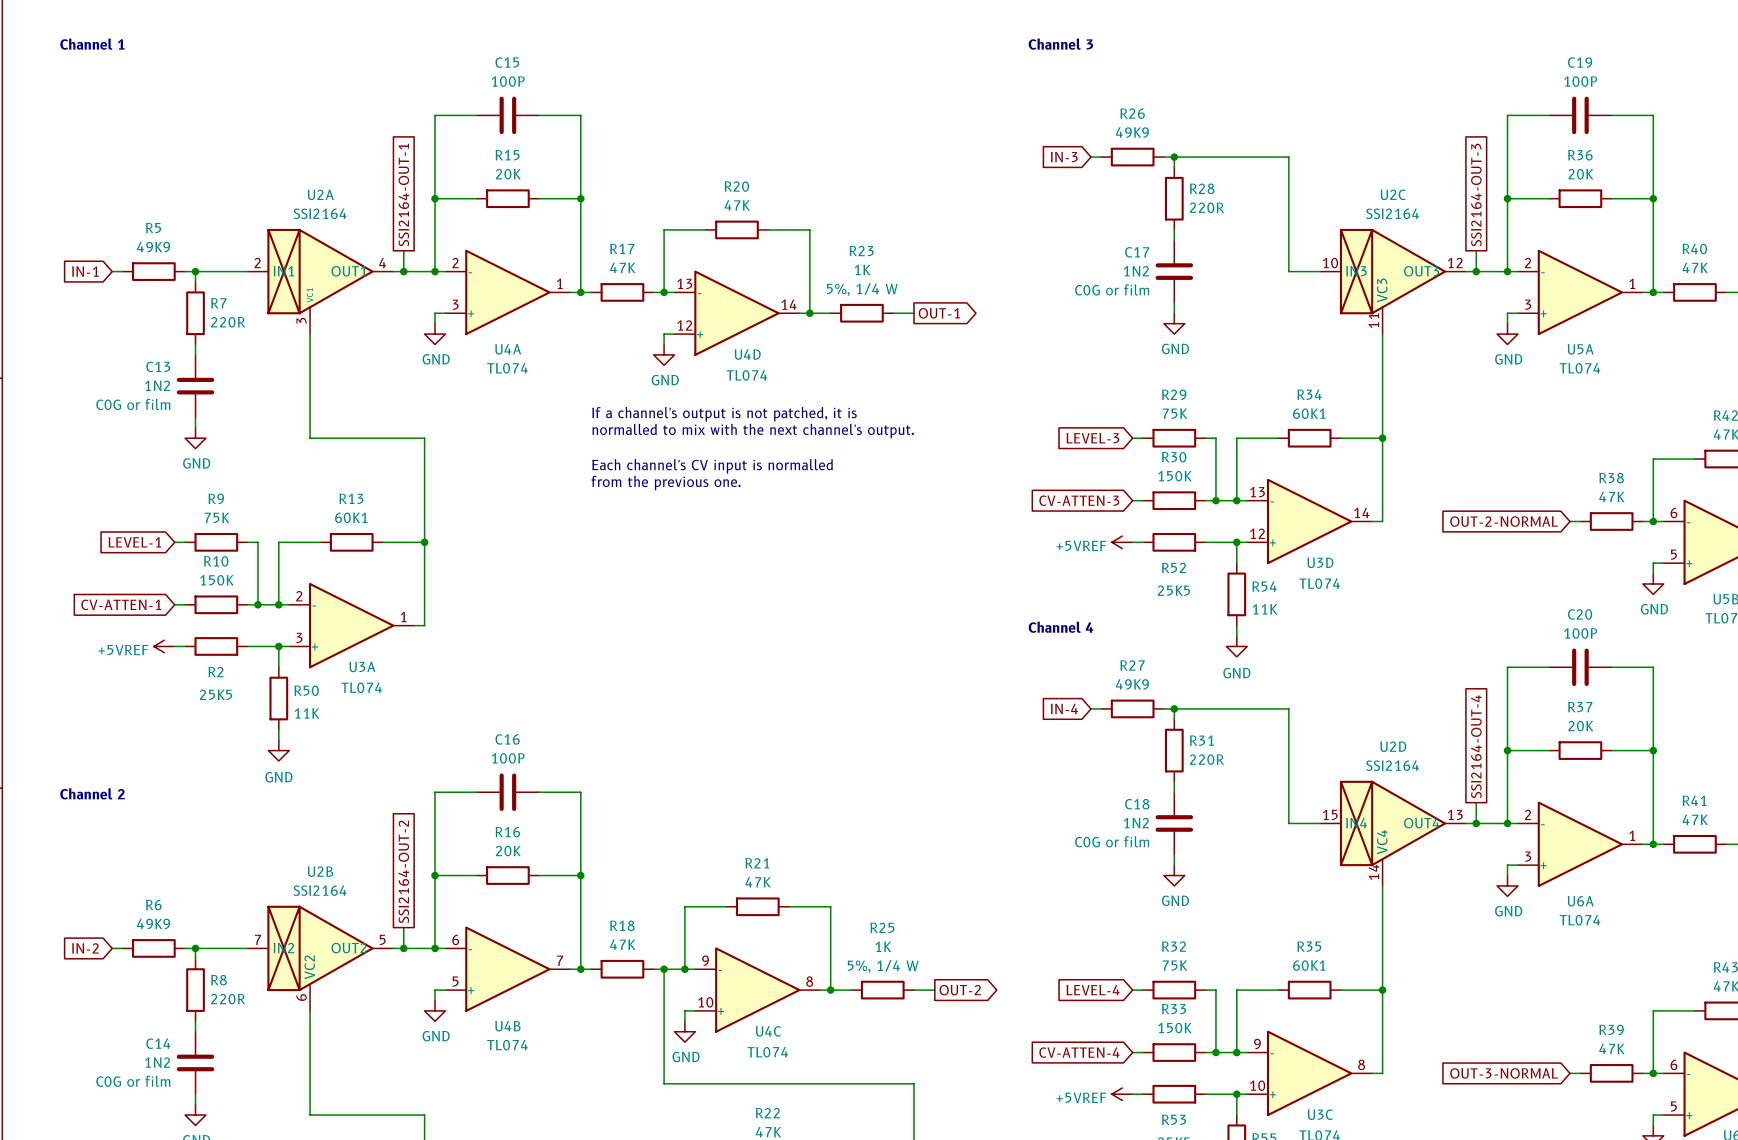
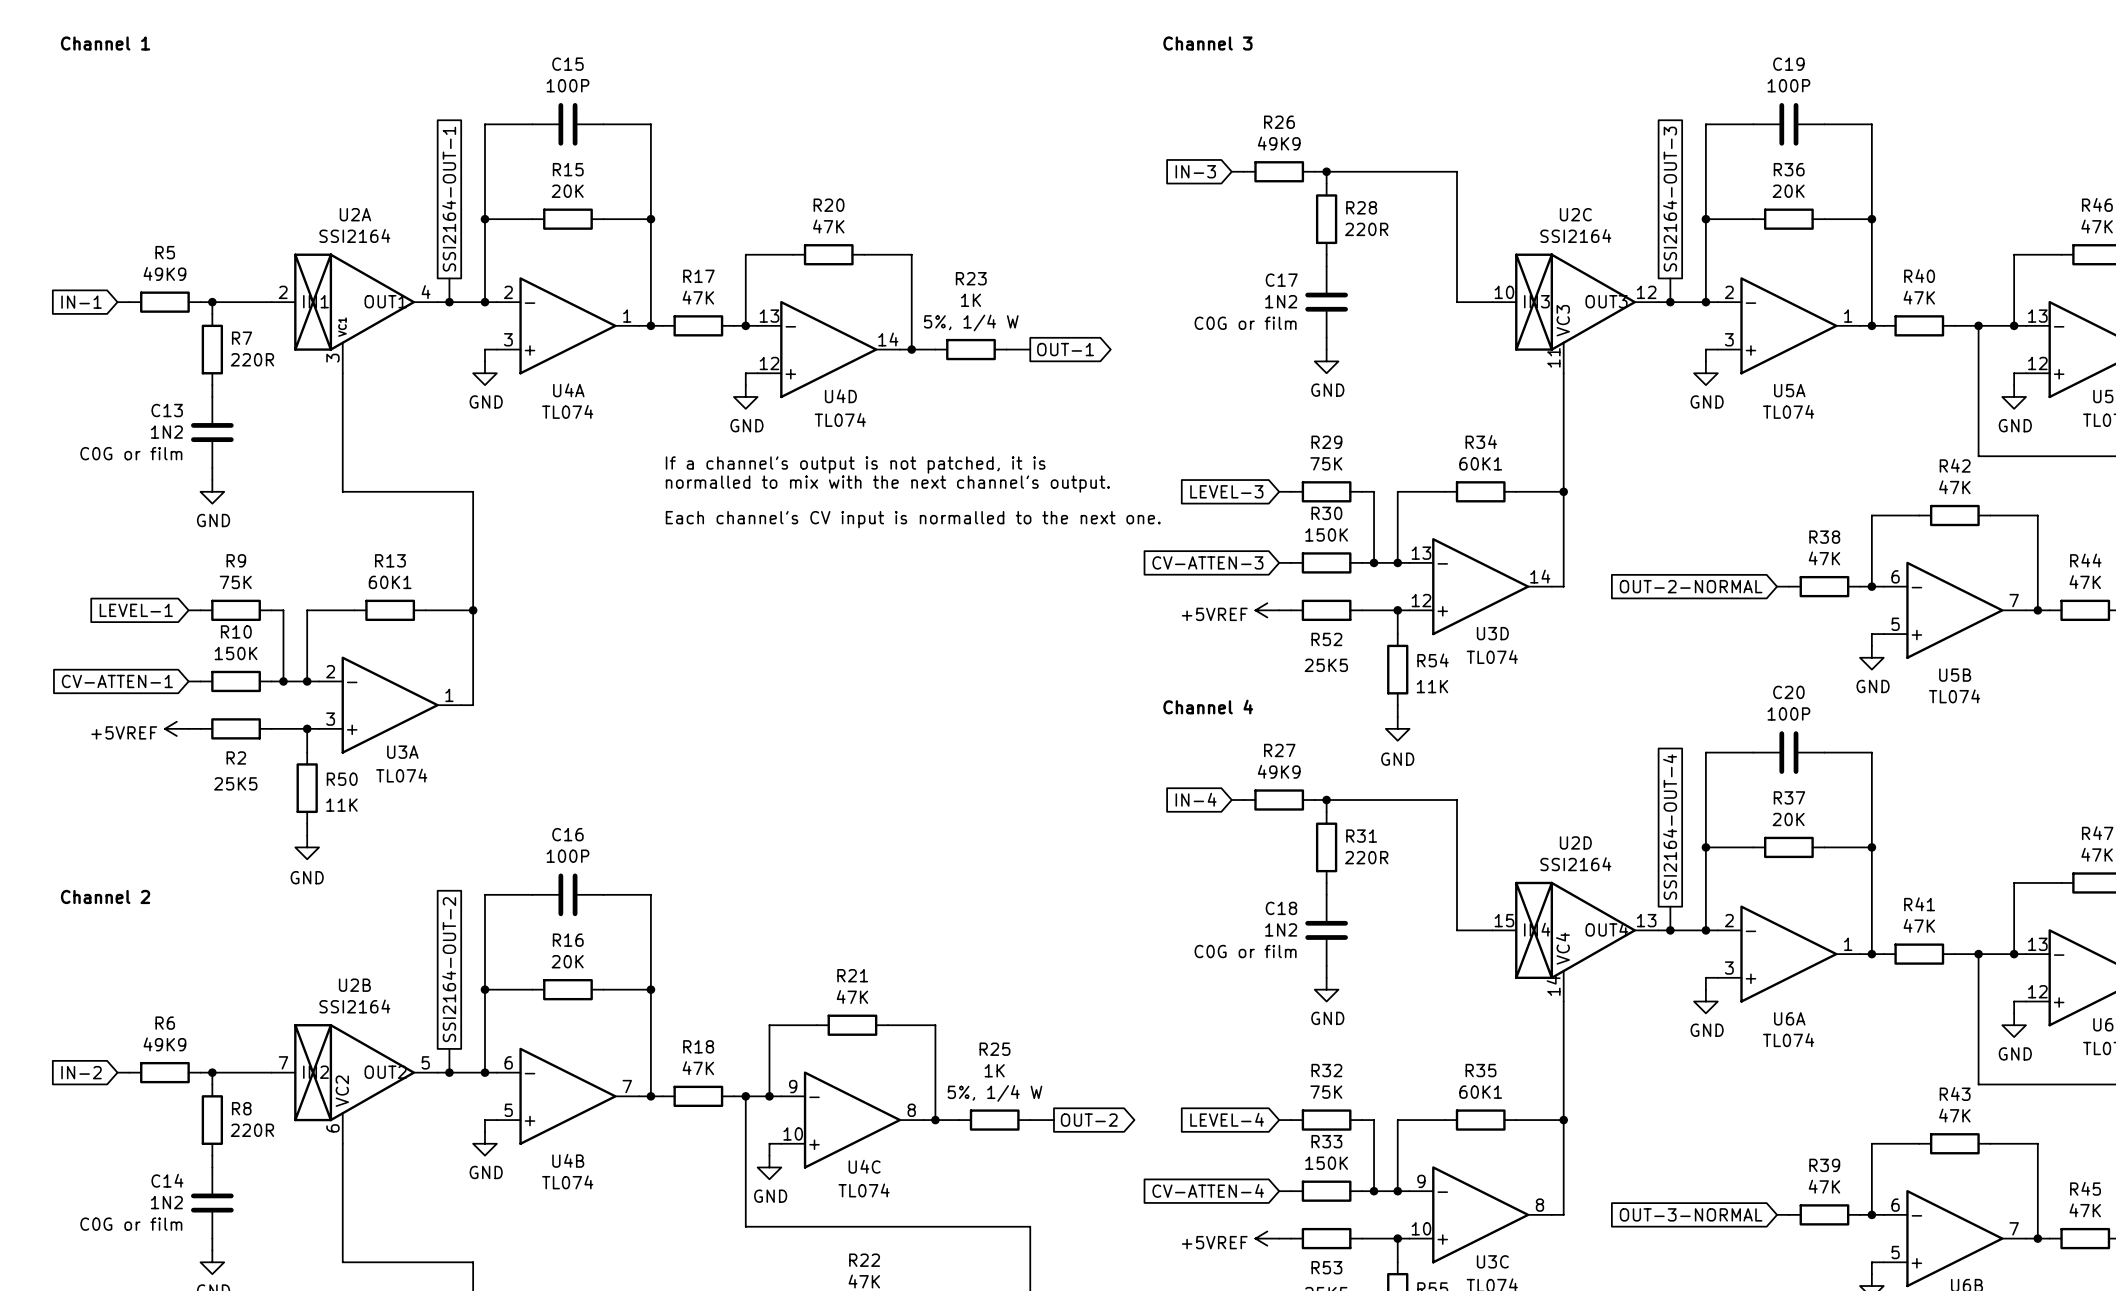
text: Each channel's CV input is normalled (712, 466) -> Each channel's CV input is normalled to the next one. (913, 519)
text: from the previous one. (666, 483) -> none

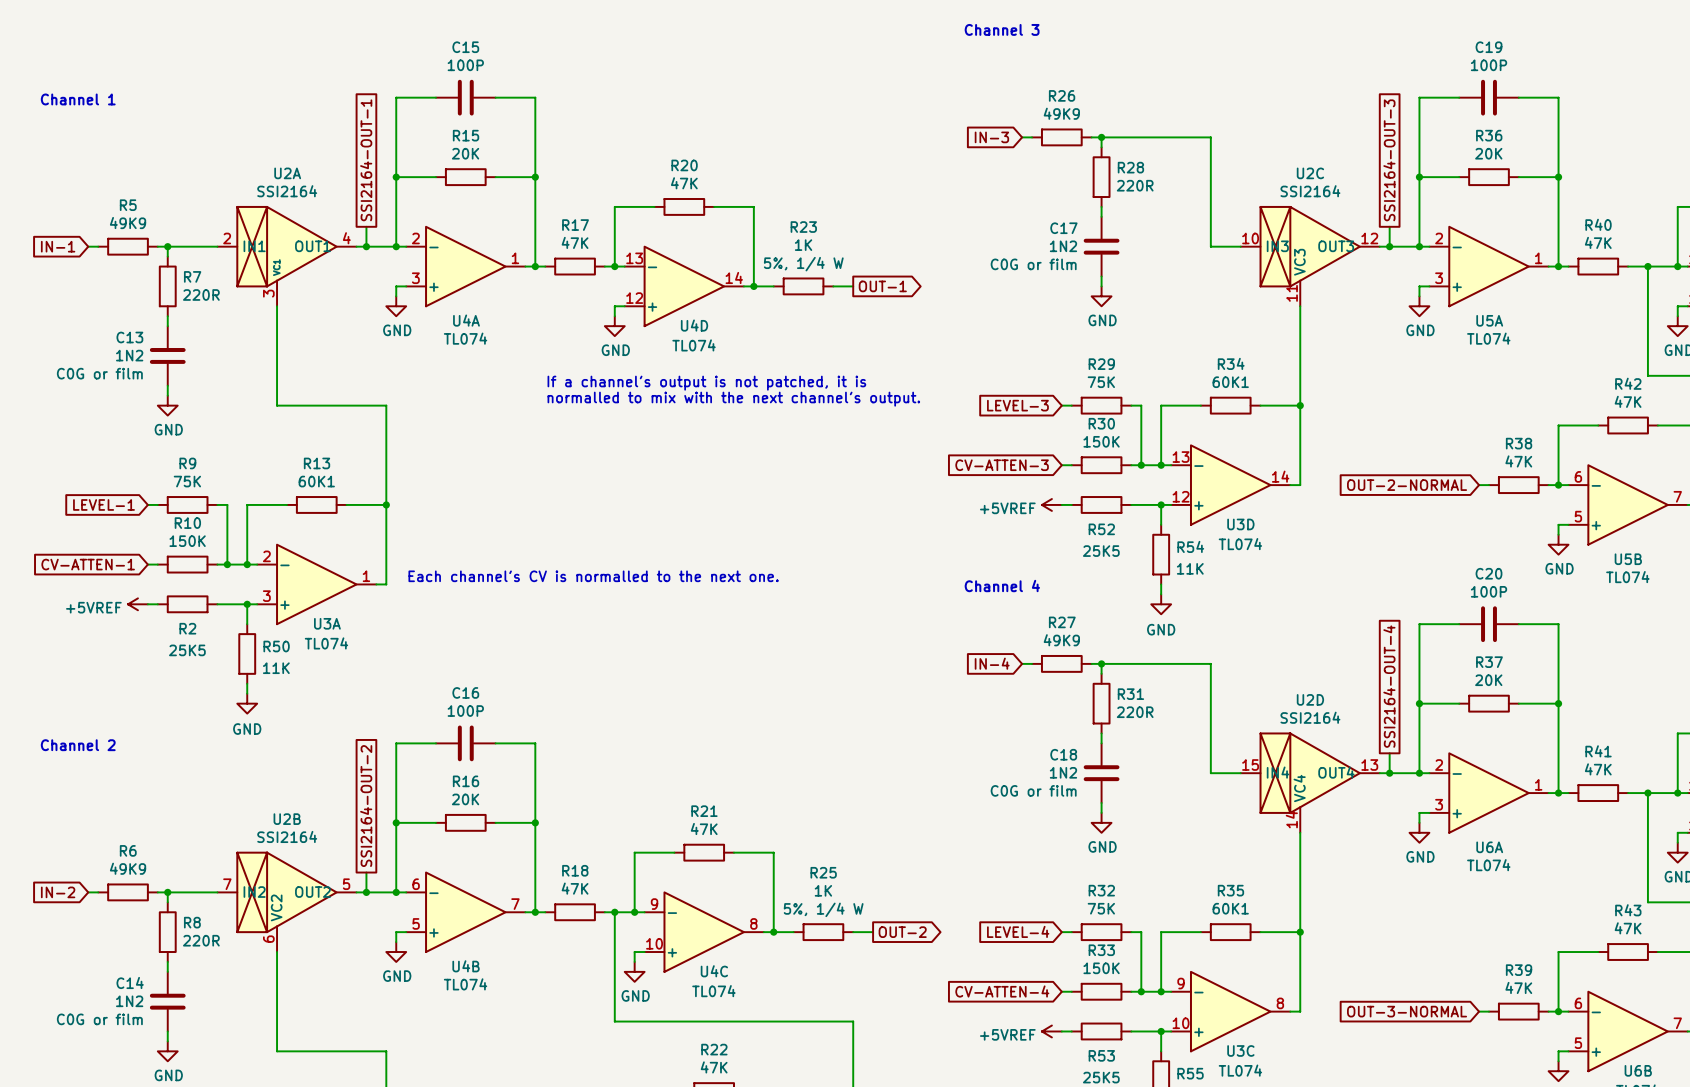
text position: Channel 1 (105, 43) -> Channel 1 (78, 99)
text: Each channel's CV input is normalled to the next one. (913, 519) -> none
text: none -> Each channel's CV is normalled to the next one. (593, 576)

